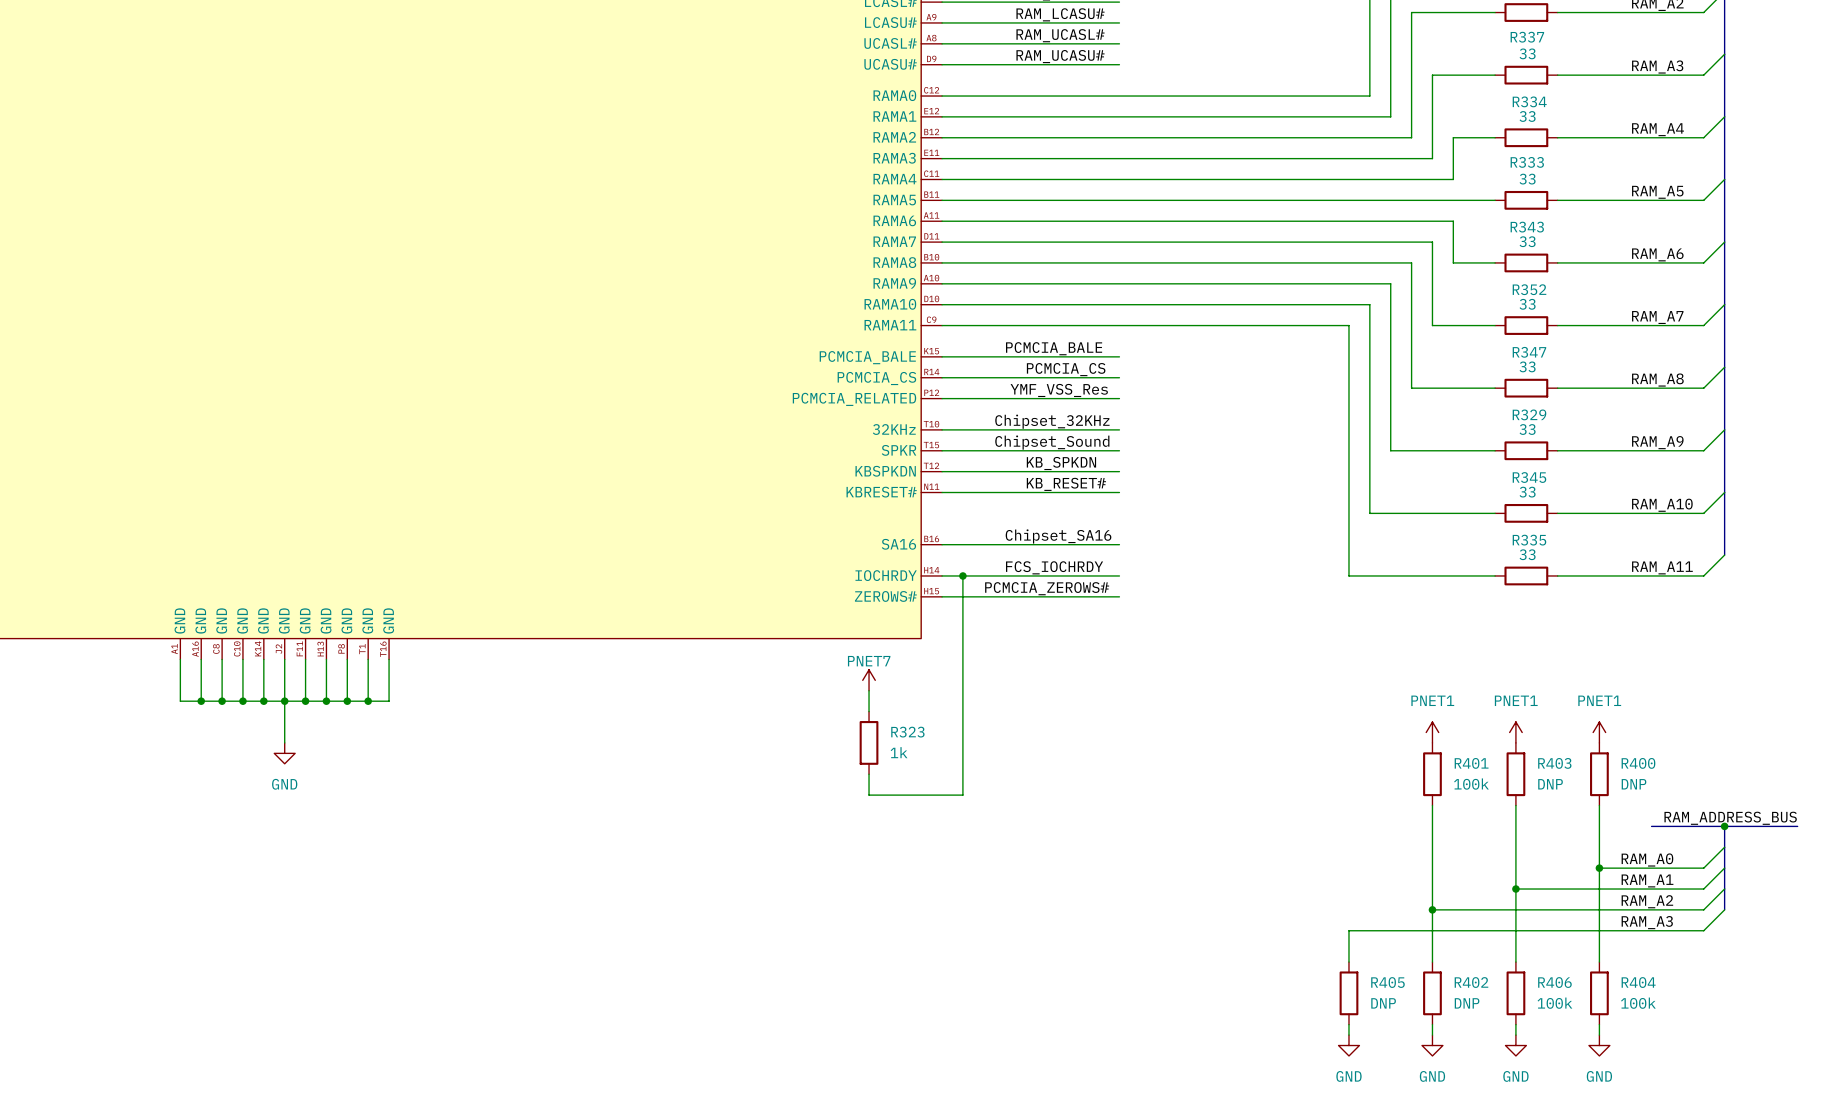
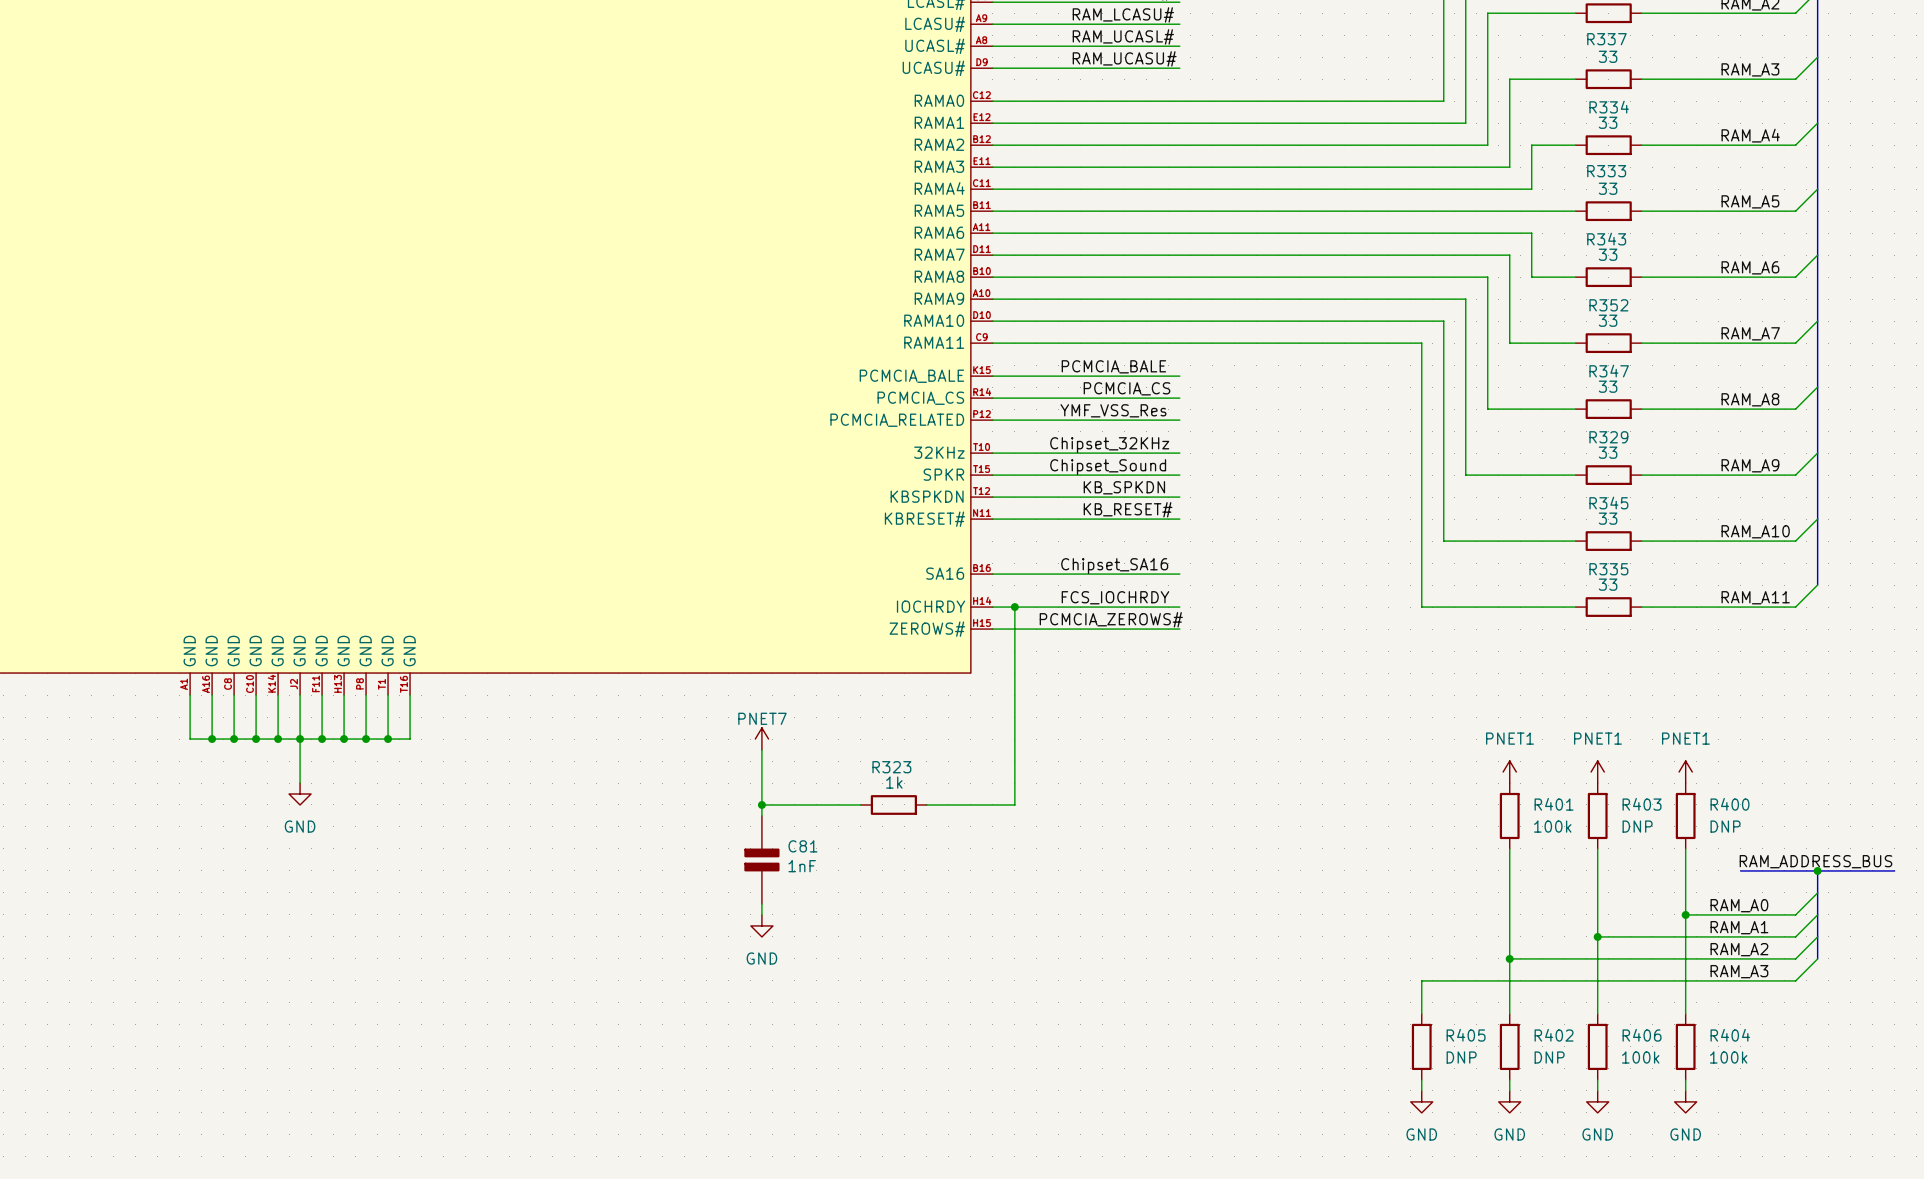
power symbol position: PNET7 (869, 680) -> PNET7 (761, 739)
wire: (869, 690) (869, 711) -> none
wire: none -> (761, 750) (761, 815)
R323 name position: R323 (907, 732) -> R323 (891, 767)
R323 rotation: 0° (869, 742) -> 90° clockwise (893, 804)
R323 value position: 1k (899, 752) -> 1k (894, 782)
wire: none -> (761, 804) (860, 804)
junction: none -> (761, 804)
wire: (962, 763) (962, 795) (869, 795) (869, 774) -> (1014, 804) (926, 804)
C81: none -> 1nF (761, 859)
wire: none -> (761, 903) (761, 914)
power symbol: none -> GND (761, 925)

